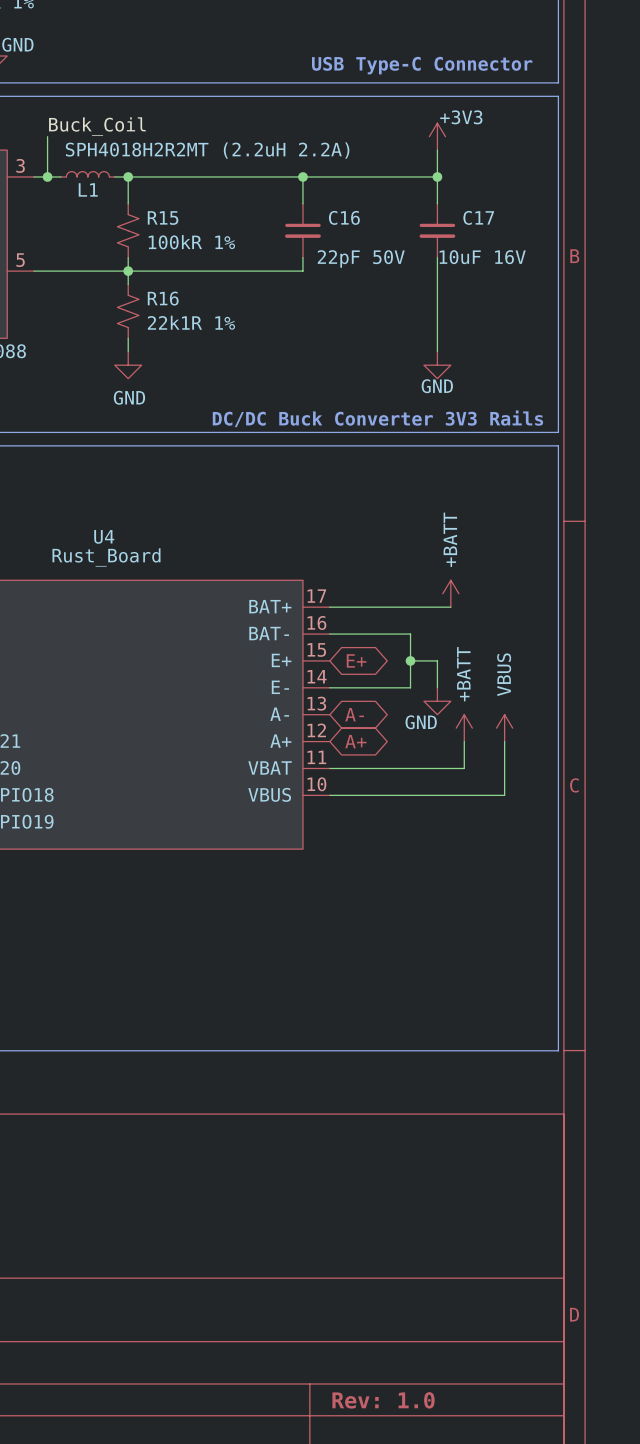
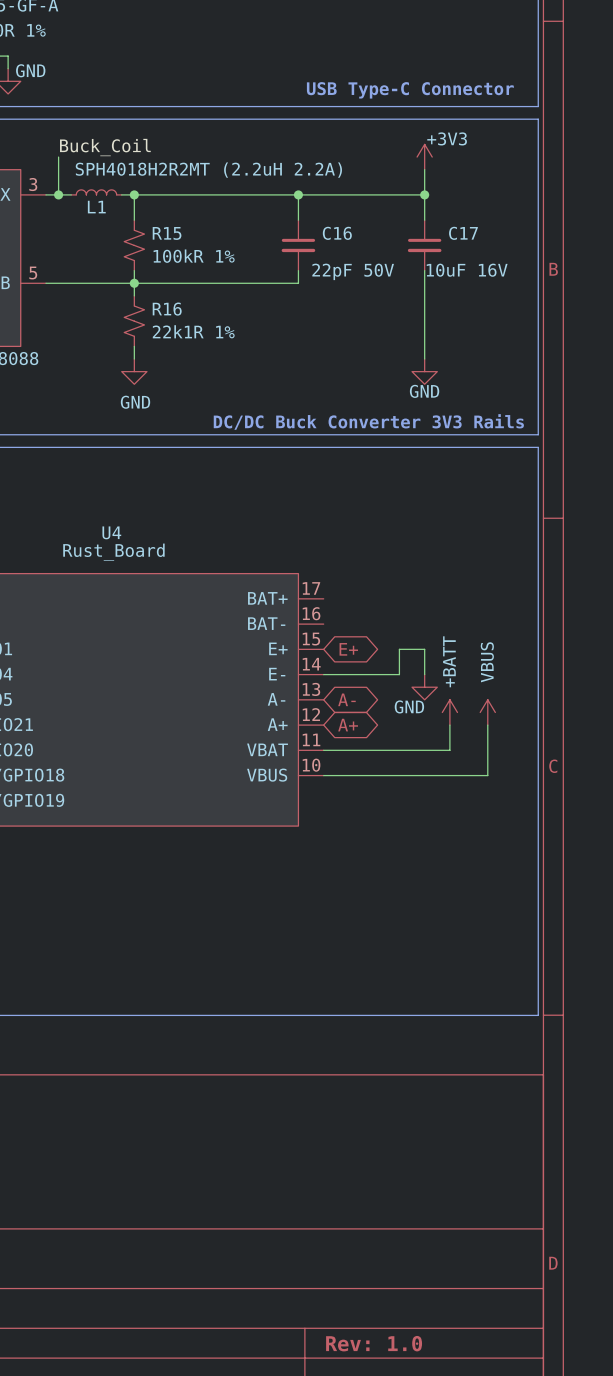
power symbol: +BATT (450, 593) -> none
wire: (329, 607) (450, 607) -> none
wire: (329, 634) (410, 634) (410, 660) -> none
junction: (410, 660) -> none

